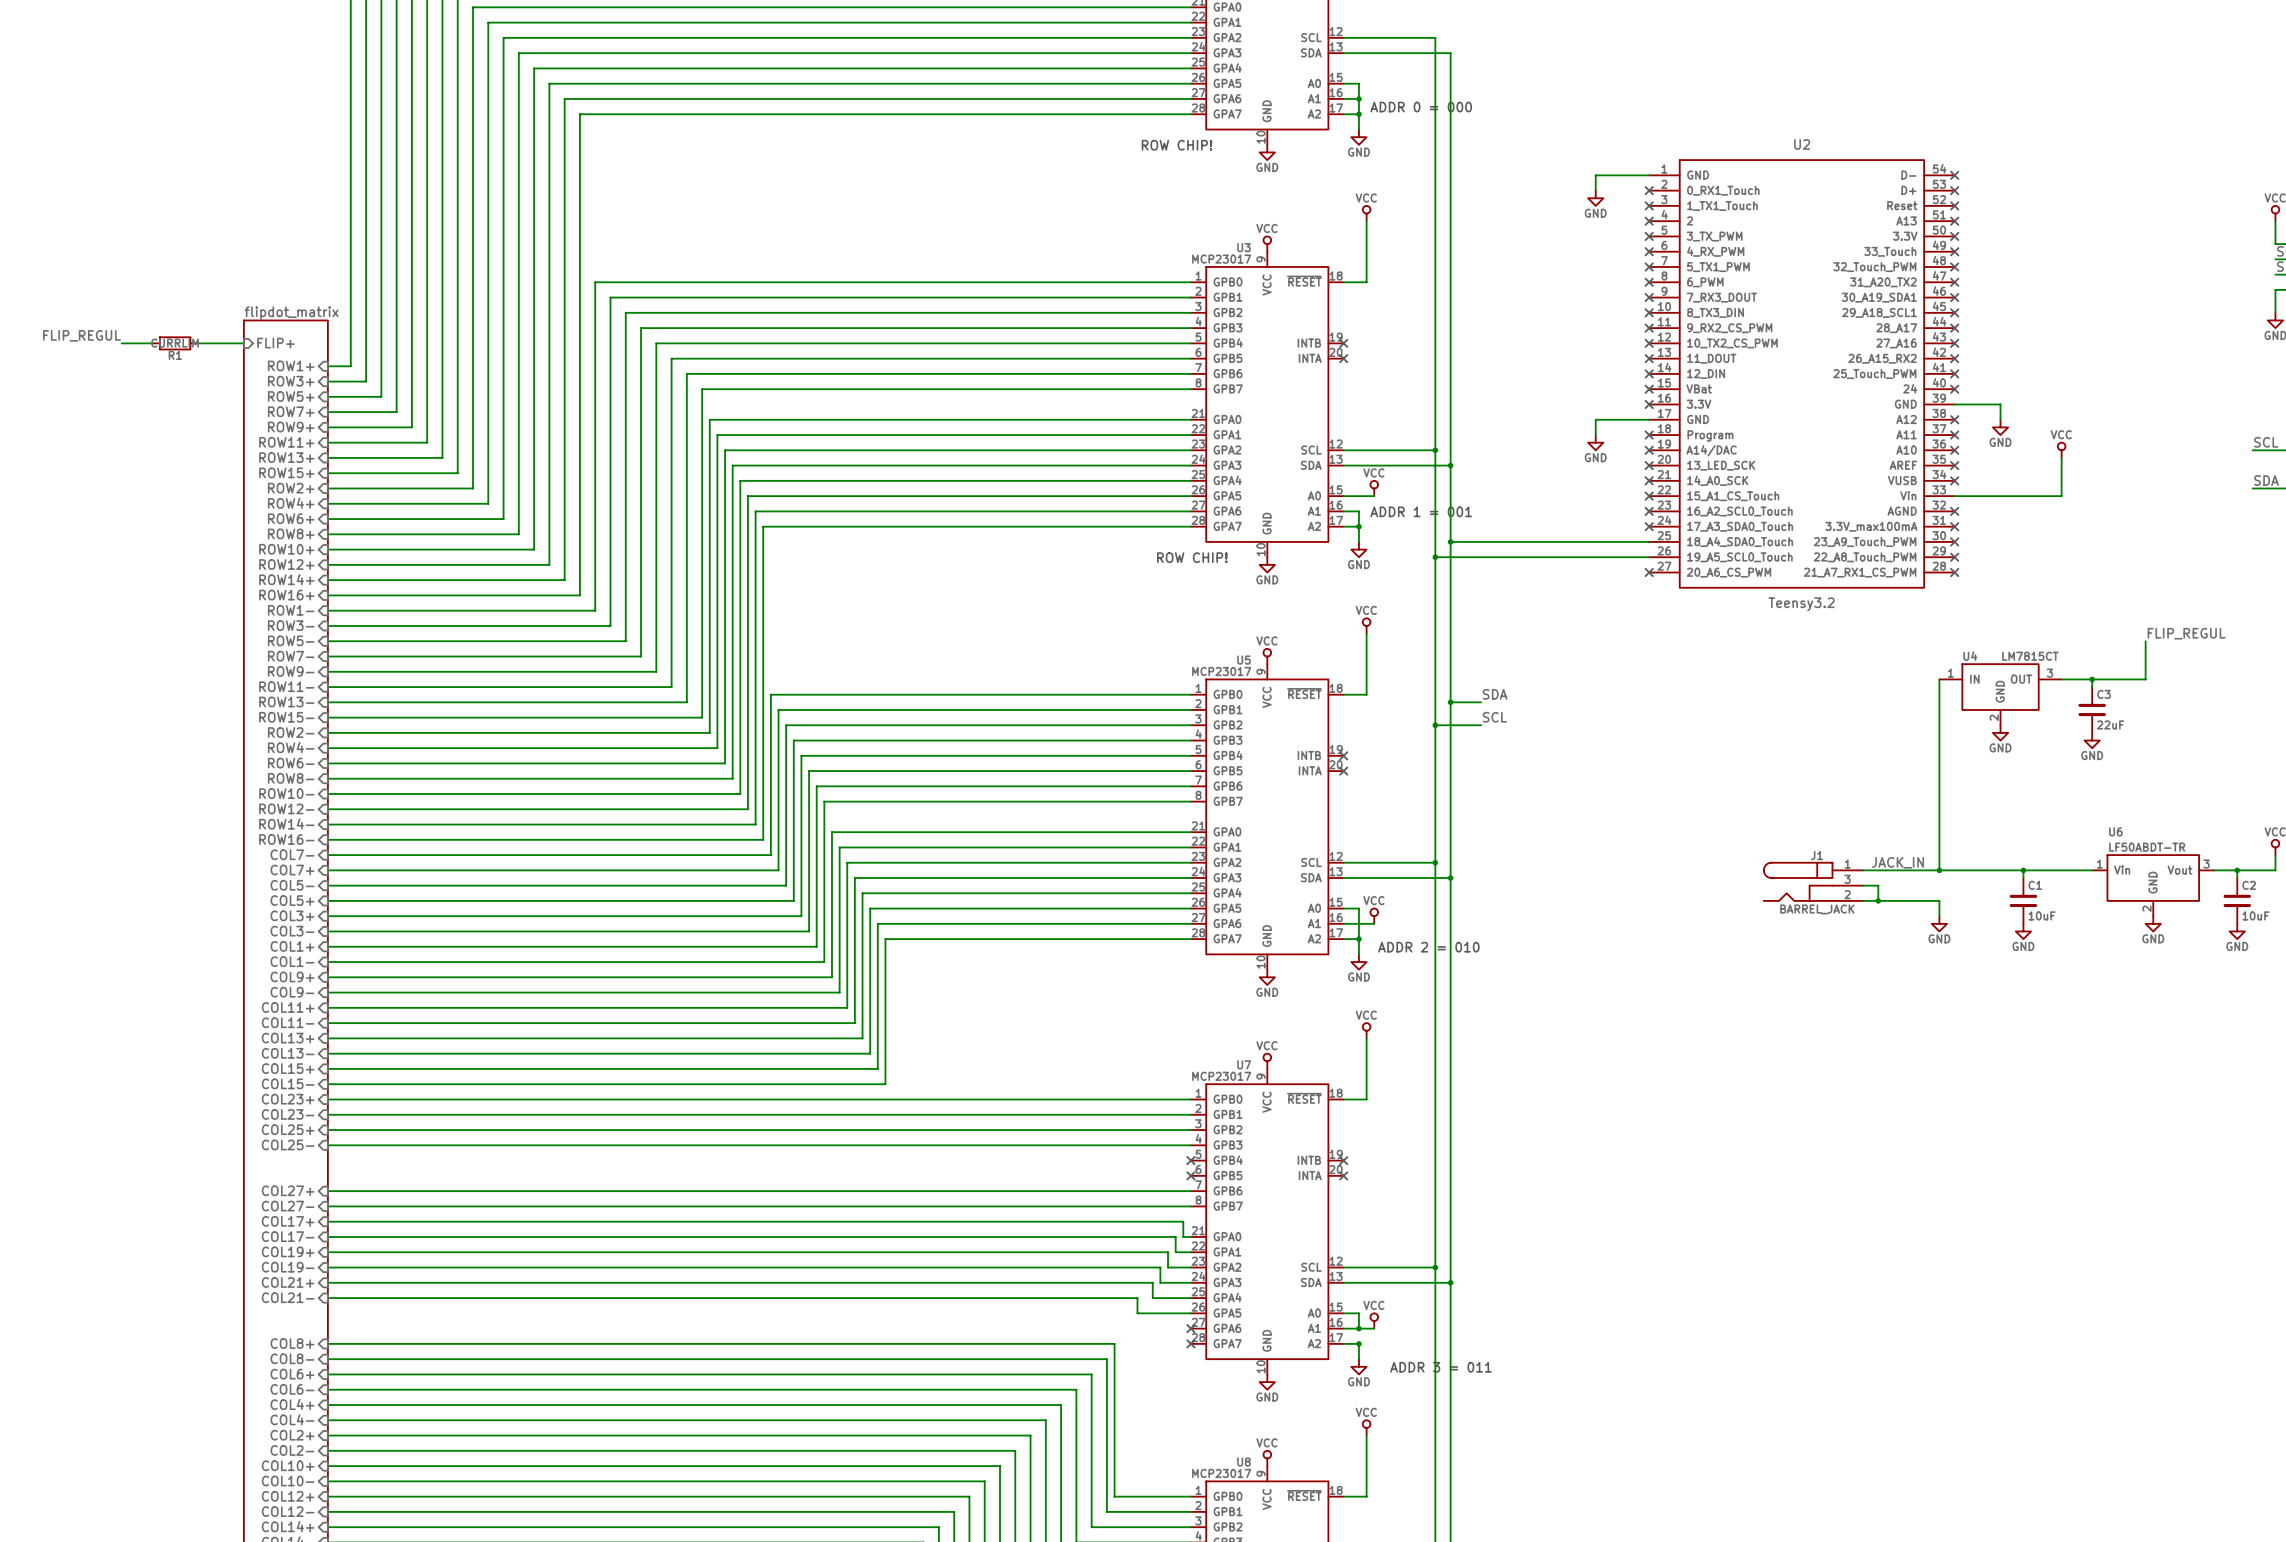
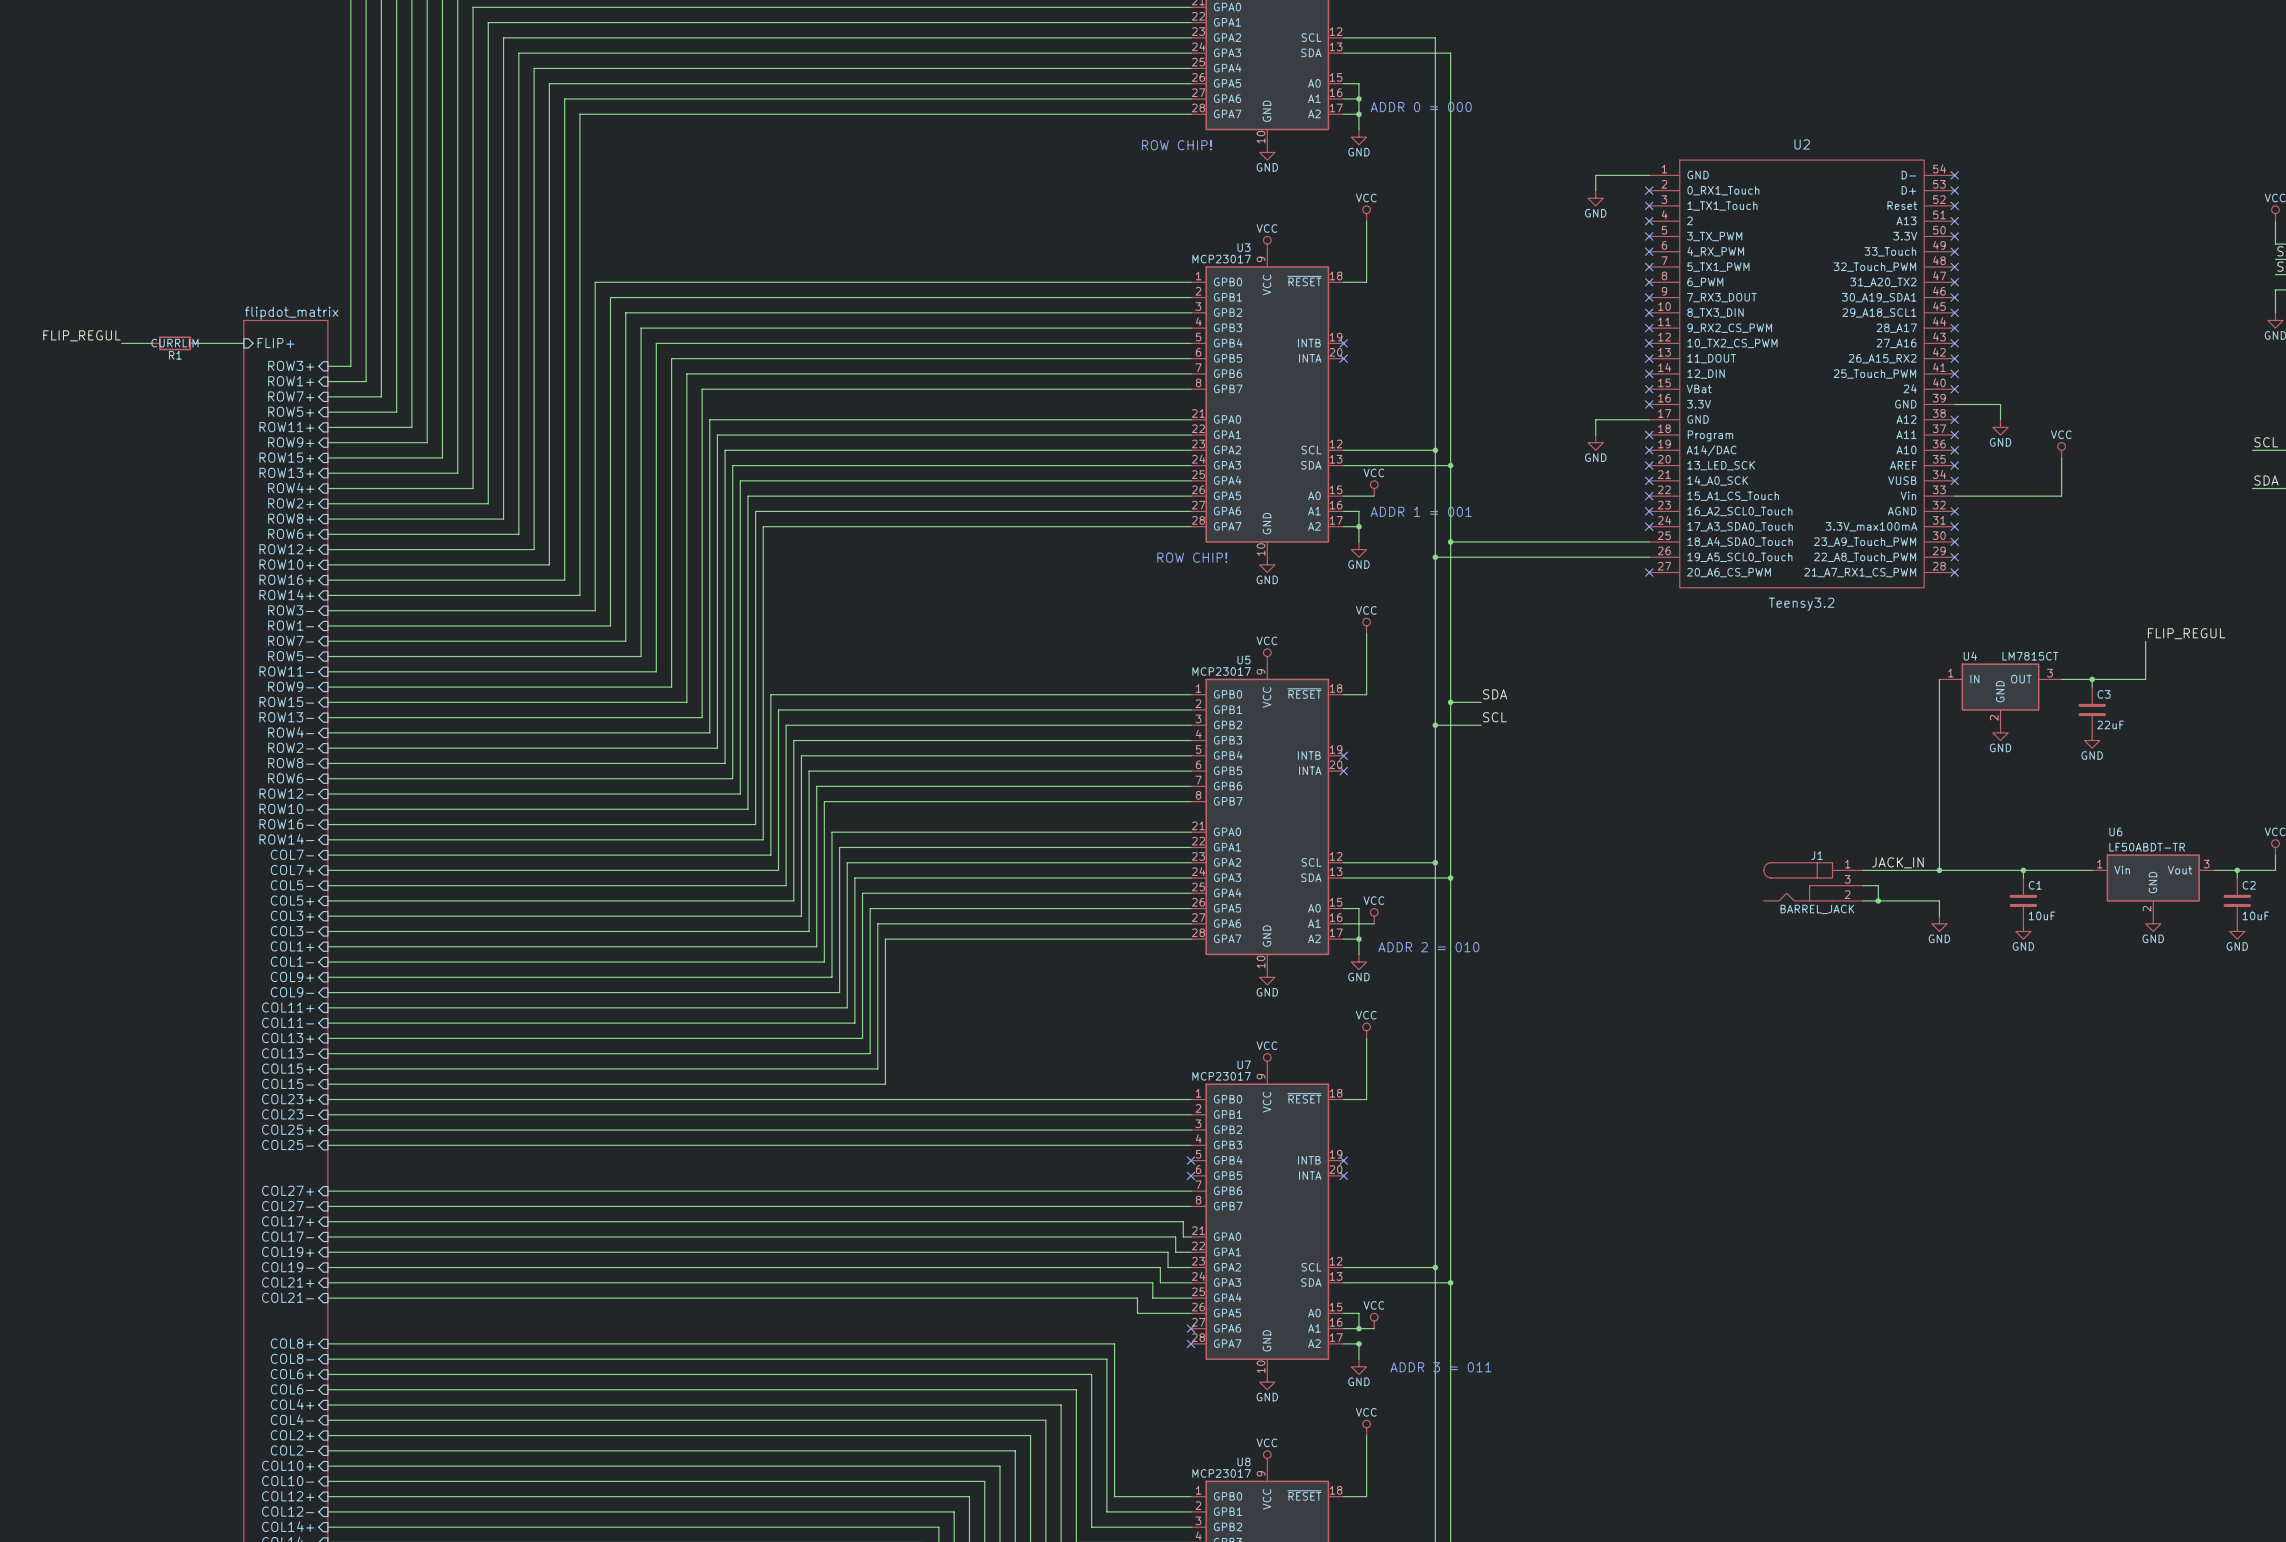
sheet pin: ROW1+ (291, 365) -> ROW3+ (291, 365)
sheet pin: ROW3+ (291, 381) -> ROW1+ (291, 381)
sheet pin: ROW5+ (291, 396) -> ROW7+ (291, 396)
sheet pin: ROW7+ (291, 411) -> ROW5+ (291, 411)
sheet pin: ROW9+ (291, 427) -> ROW11+ (286, 427)
sheet pin: ROW11+ (286, 442) -> ROW9+ (291, 442)
sheet pin: ROW13+ (286, 457) -> ROW15+ (286, 457)
sheet pin: ROW15+ (286, 472) -> ROW13+ (286, 472)
sheet pin: ROW2+ (291, 488) -> ROW4+ (291, 487)
sheet pin: ROW4+ (291, 503) -> ROW2+ (291, 503)
sheet pin: ROW6+ (291, 518) -> ROW8+ (291, 518)
sheet pin: ROW8+ (291, 533) -> ROW6+ (291, 533)
sheet pin: ROW10+ (286, 549) -> ROW12+ (286, 549)
sheet pin: ROW12+ (286, 564) -> ROW10+ (286, 564)
sheet pin: ROW14+ (286, 579) -> ROW16+ (286, 579)
sheet pin: ROW16+ (286, 595) -> ROW14+ (286, 594)
sheet pin: ROW1- (291, 610) -> ROW3- (291, 610)
sheet pin: ROW3- (291, 625) -> ROW1- (291, 625)
sheet pin: ROW5- (291, 640) -> ROW7- (291, 640)
sheet pin: ROW7- (291, 656) -> ROW5- (291, 656)
sheet pin: ROW9- (291, 671) -> ROW11- (286, 671)
sheet pin: ROW11- (286, 686) -> ROW9- (291, 686)
sheet pin: ROW13- (286, 702) -> ROW15- (286, 702)
sheet pin: ROW15- (286, 717) -> ROW13- (286, 717)
sheet pin: ROW2- (291, 732) -> ROW4- (291, 732)
sheet pin: ROW4- (291, 747) -> ROW2- (291, 747)
sheet pin: ROW6- (291, 763) -> ROW8- (291, 763)
sheet pin: ROW8- (291, 778) -> ROW6- (291, 778)
sheet pin: ROW10- (286, 793) -> ROW12- (286, 793)
sheet pin: ROW12- (286, 808) -> ROW10- (286, 808)
sheet pin: ROW14- (286, 823) -> ROW16- (286, 824)
sheet pin: ROW16- (286, 839) -> ROW14- (286, 839)

